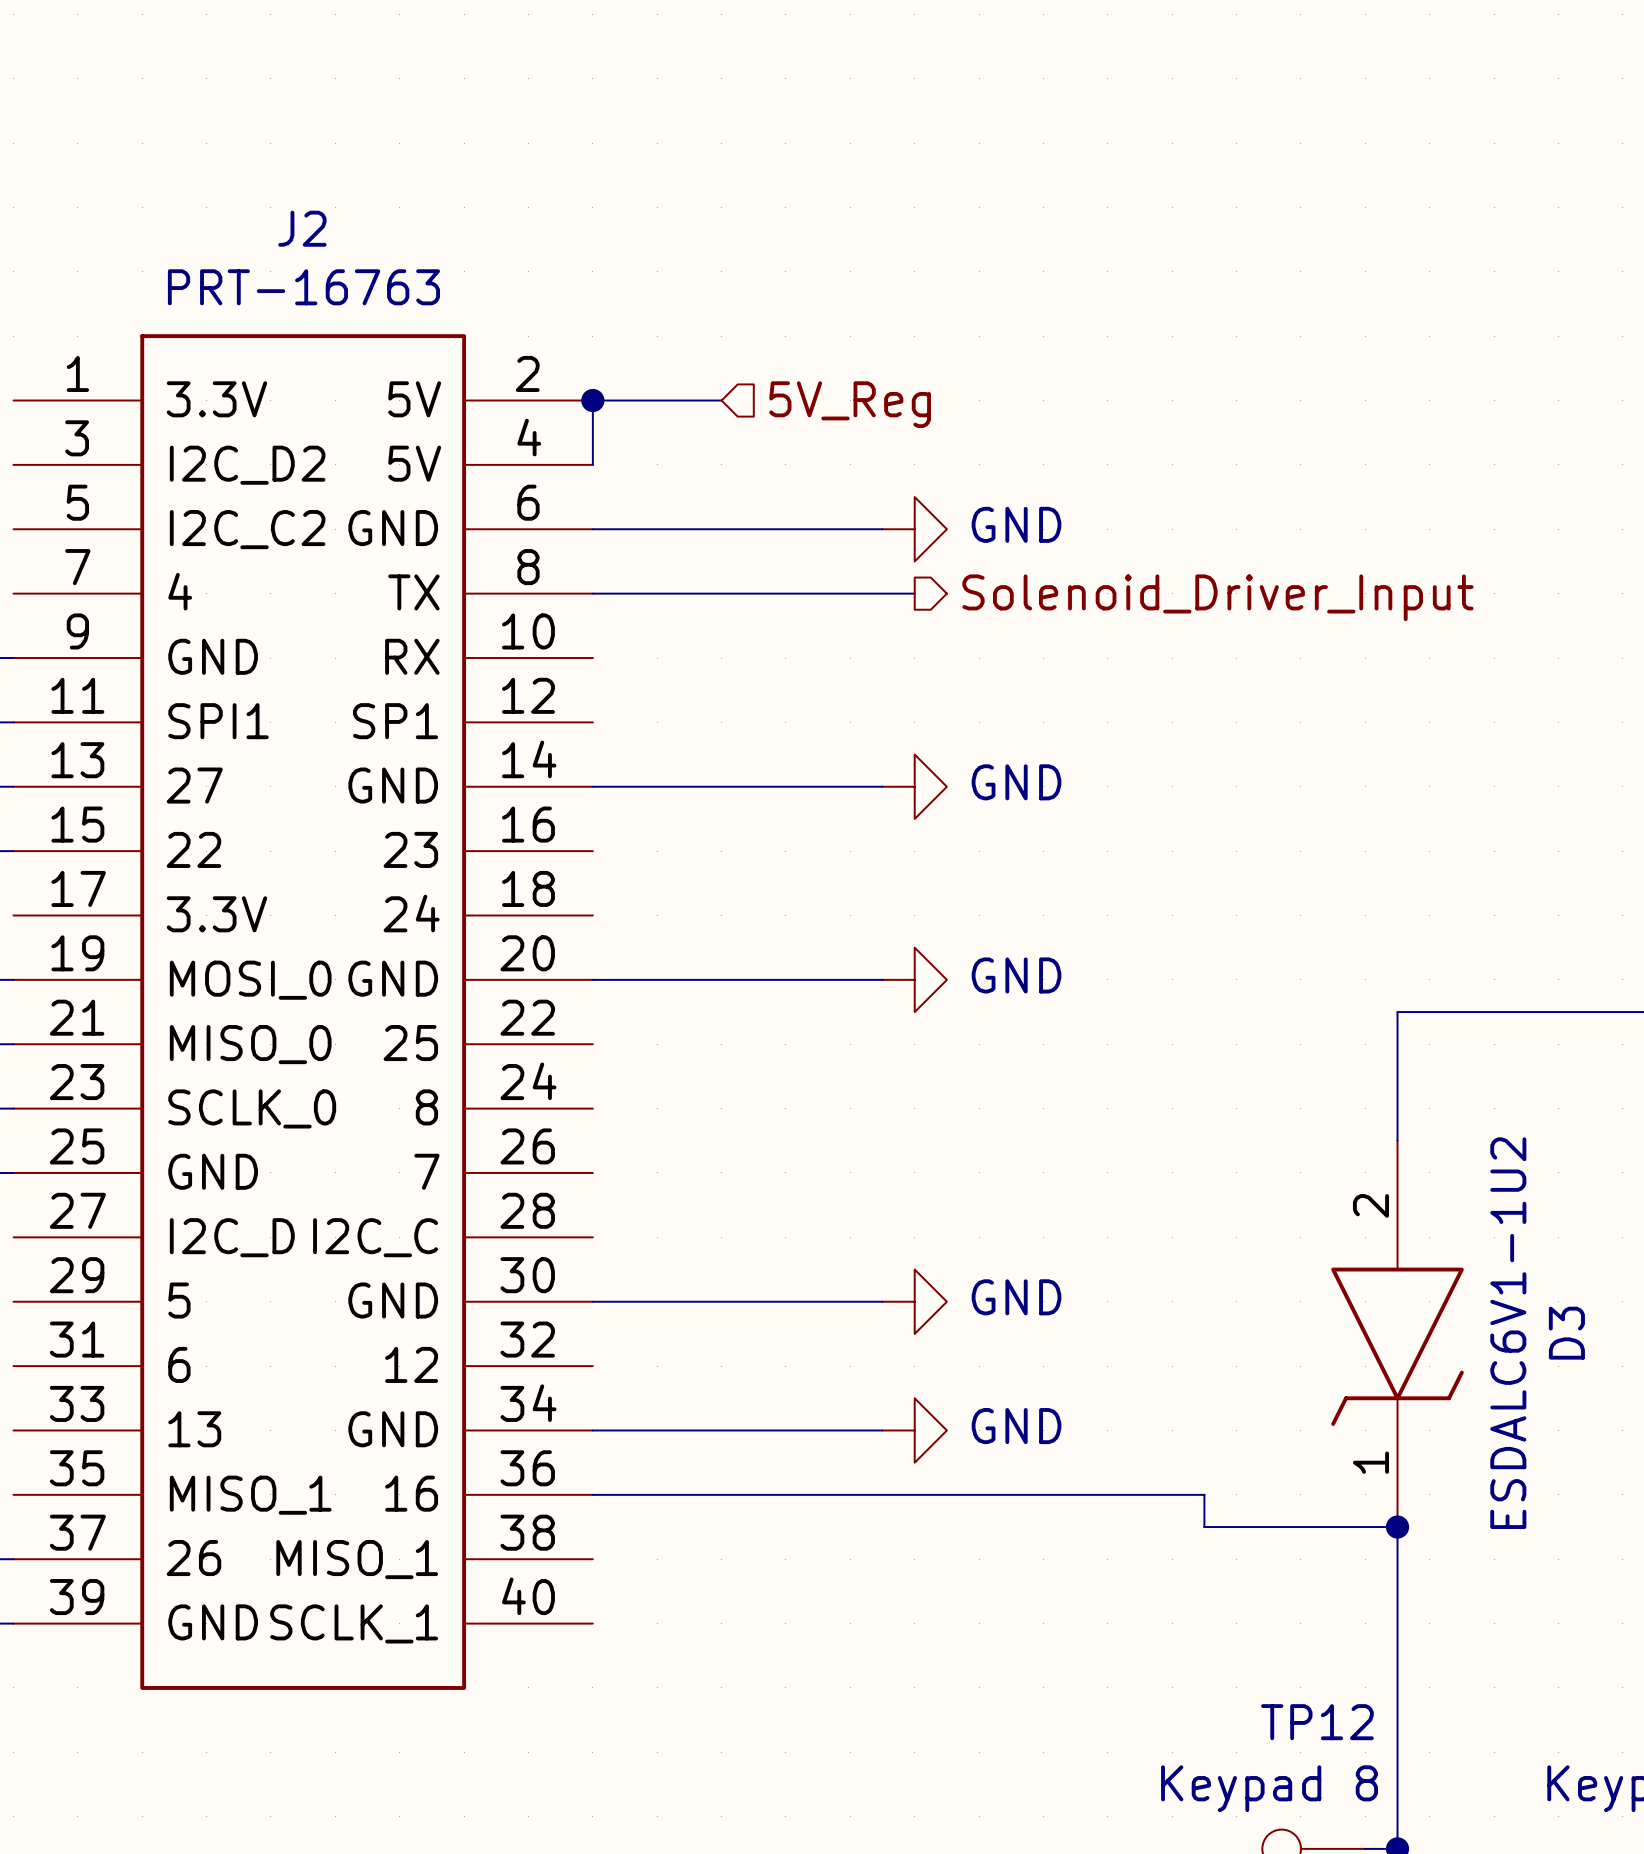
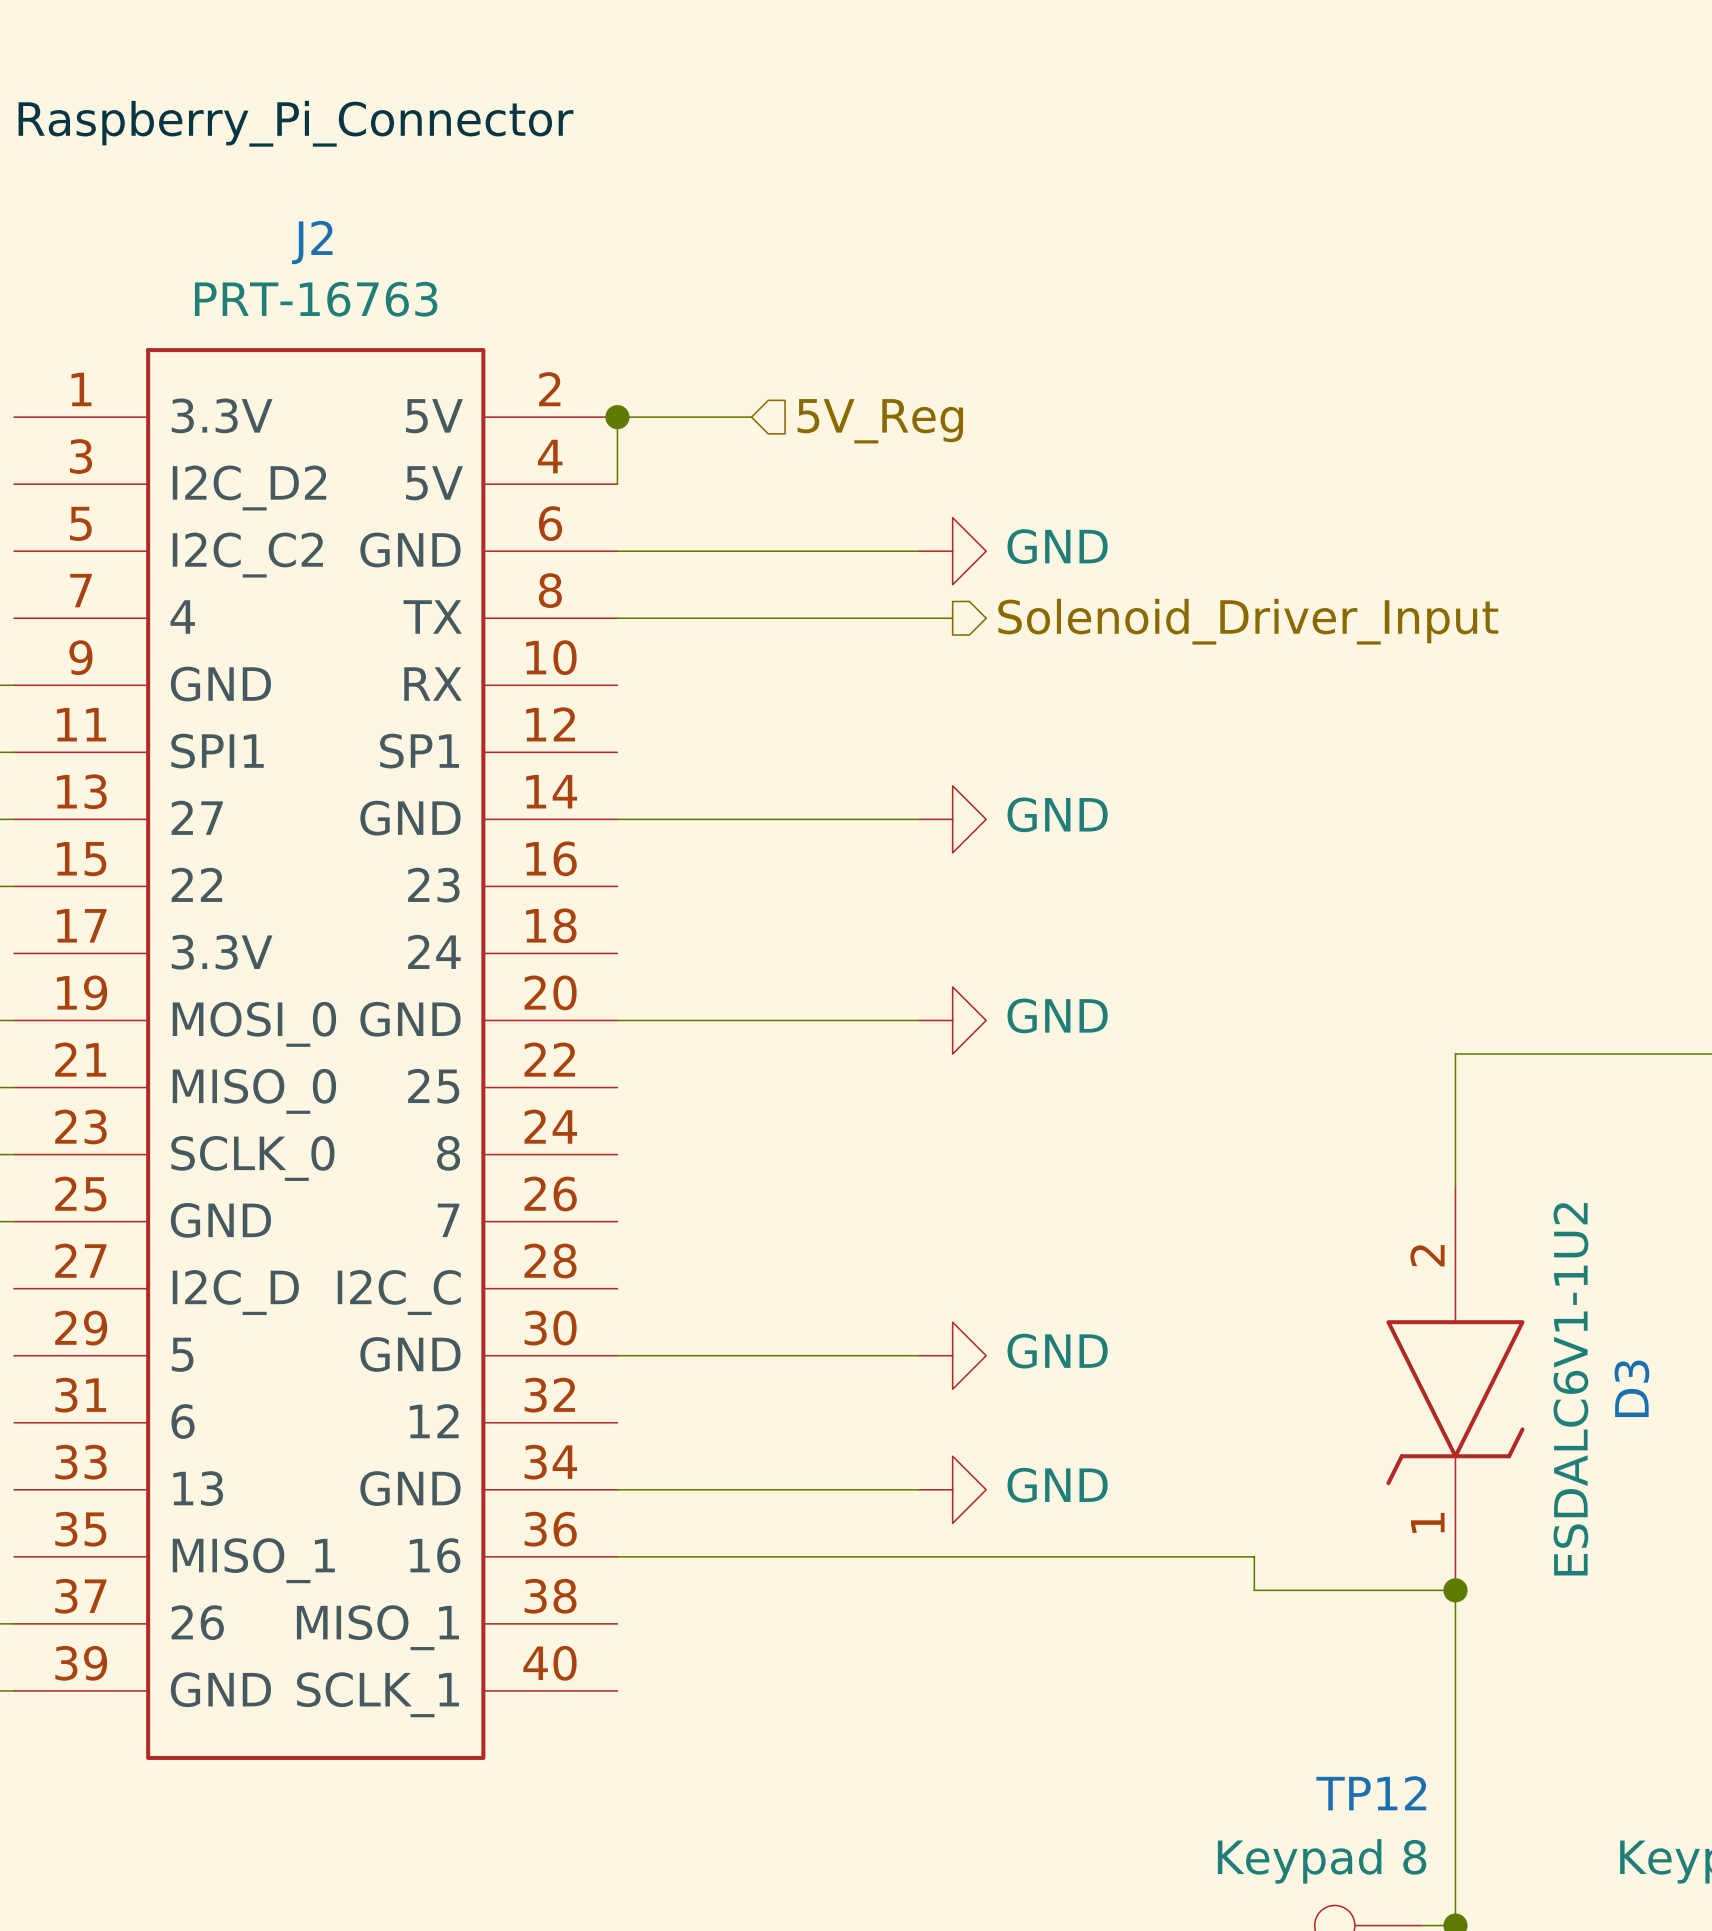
label: none -> Raspberry_Pi_Connector (296, 123)

